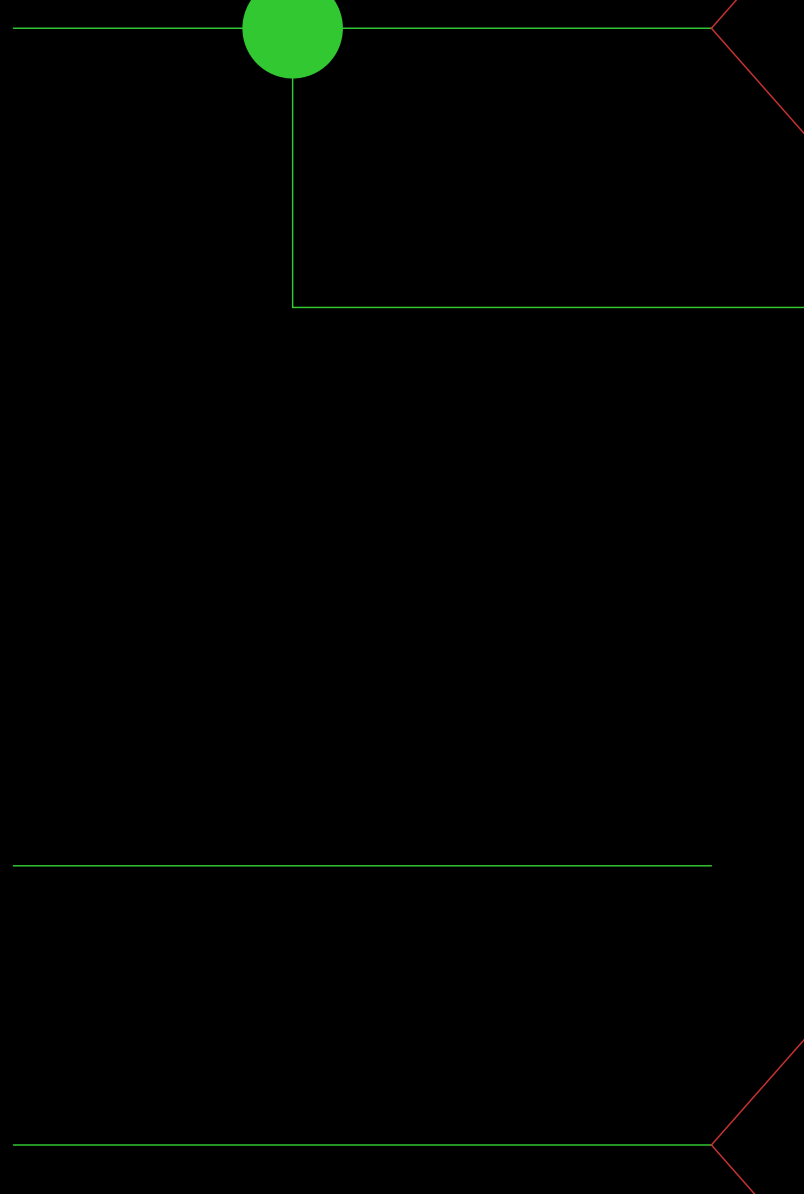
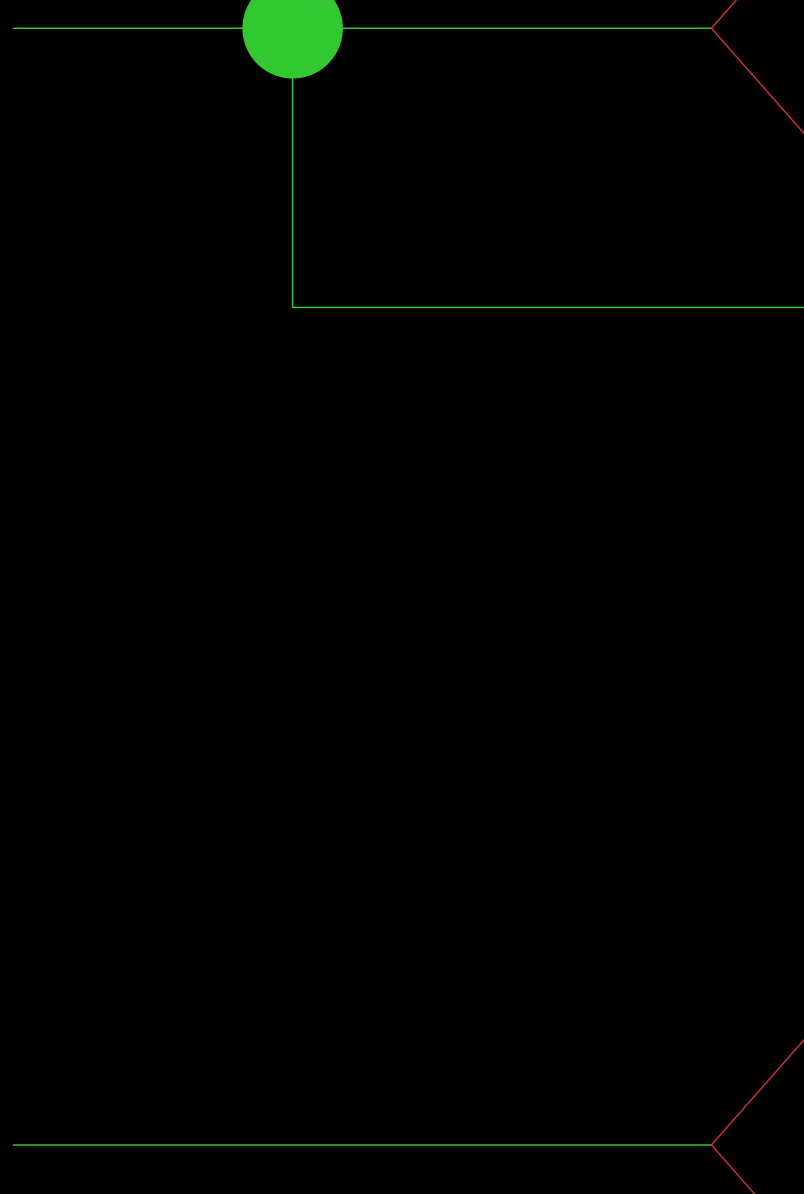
wire: (13, 865) (711, 865) -> none

